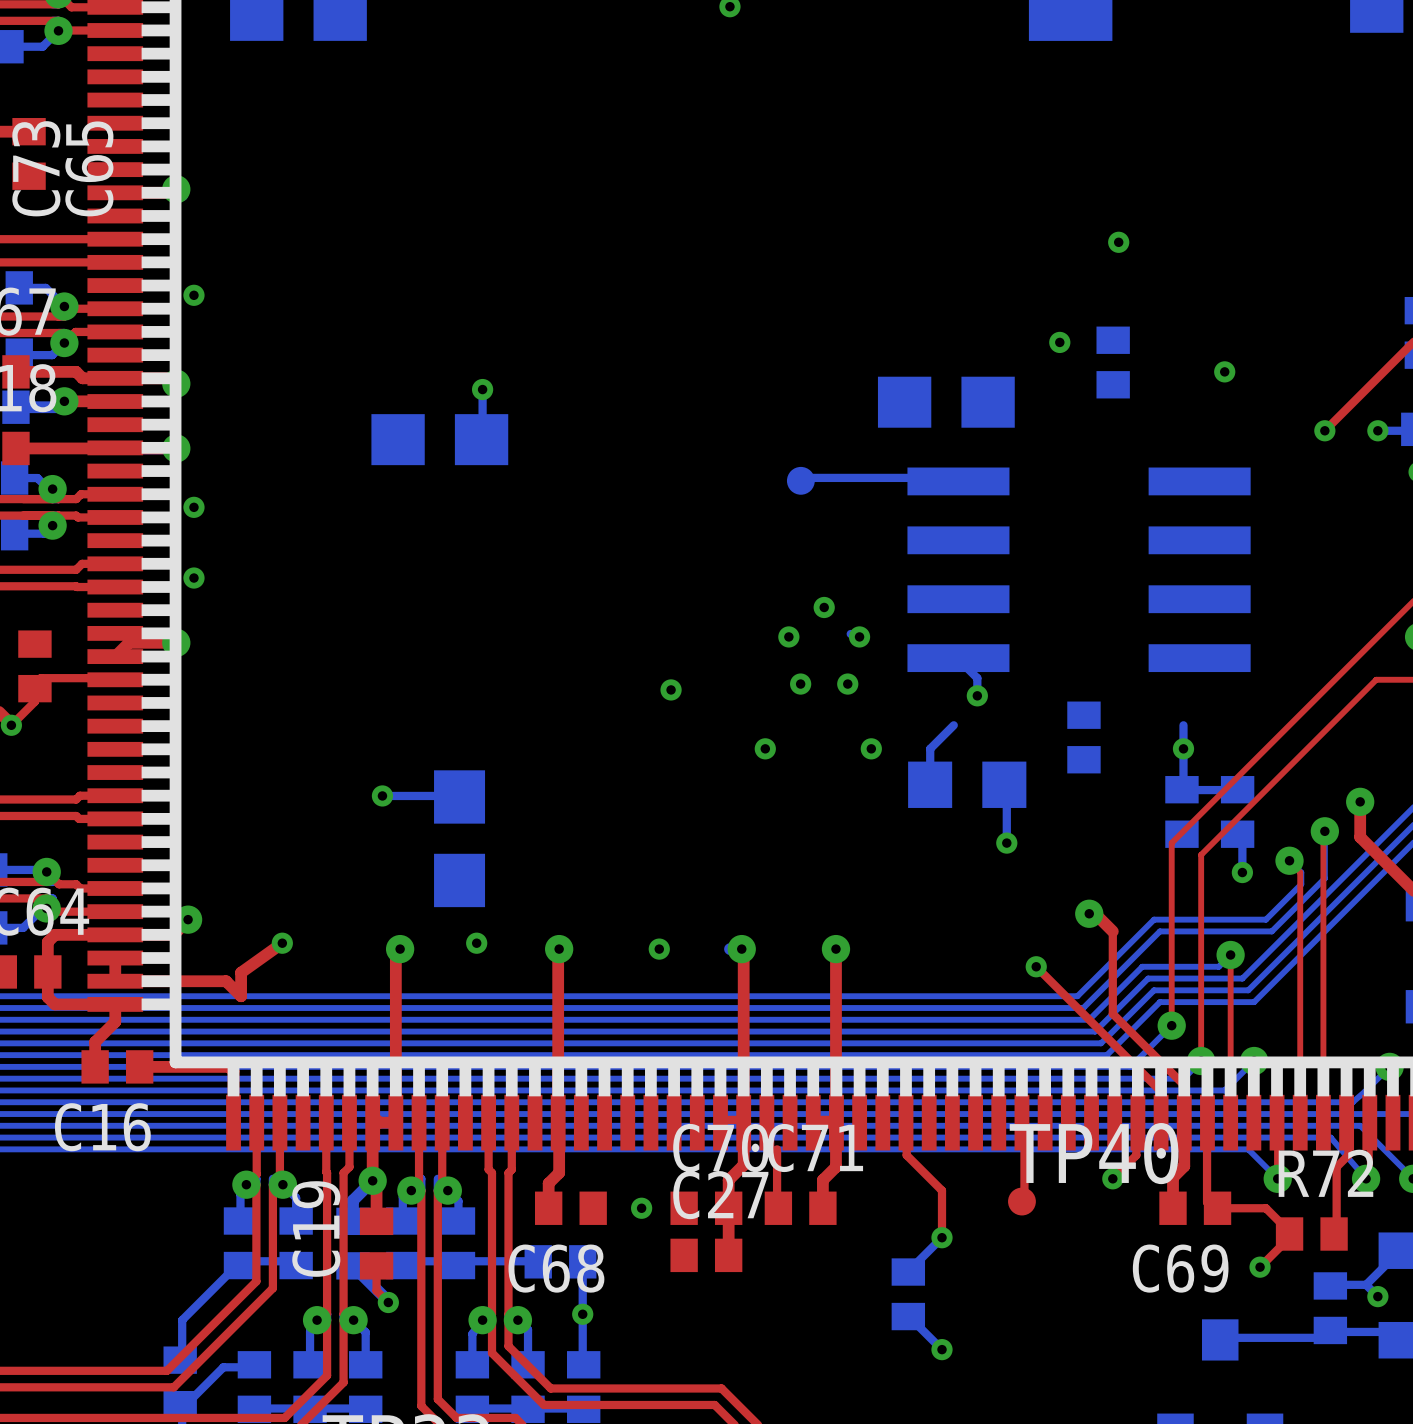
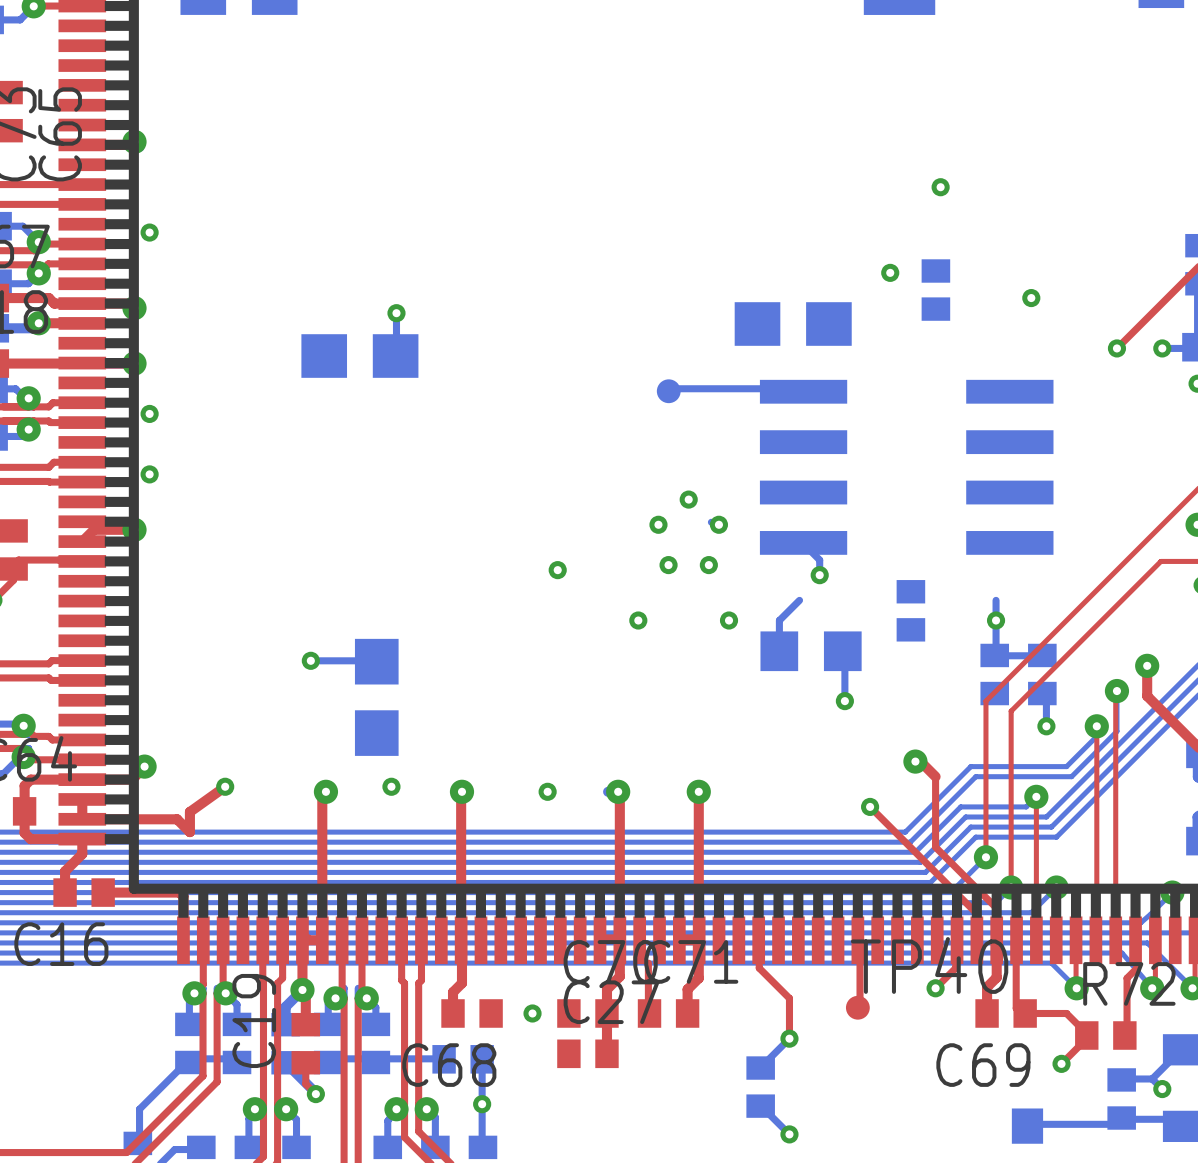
top track: (1289, 860) (1300, 872) (1300, 1122) -> (1096, 726) (1096, 940)
via position: (1289, 860) -> (1096, 726)

